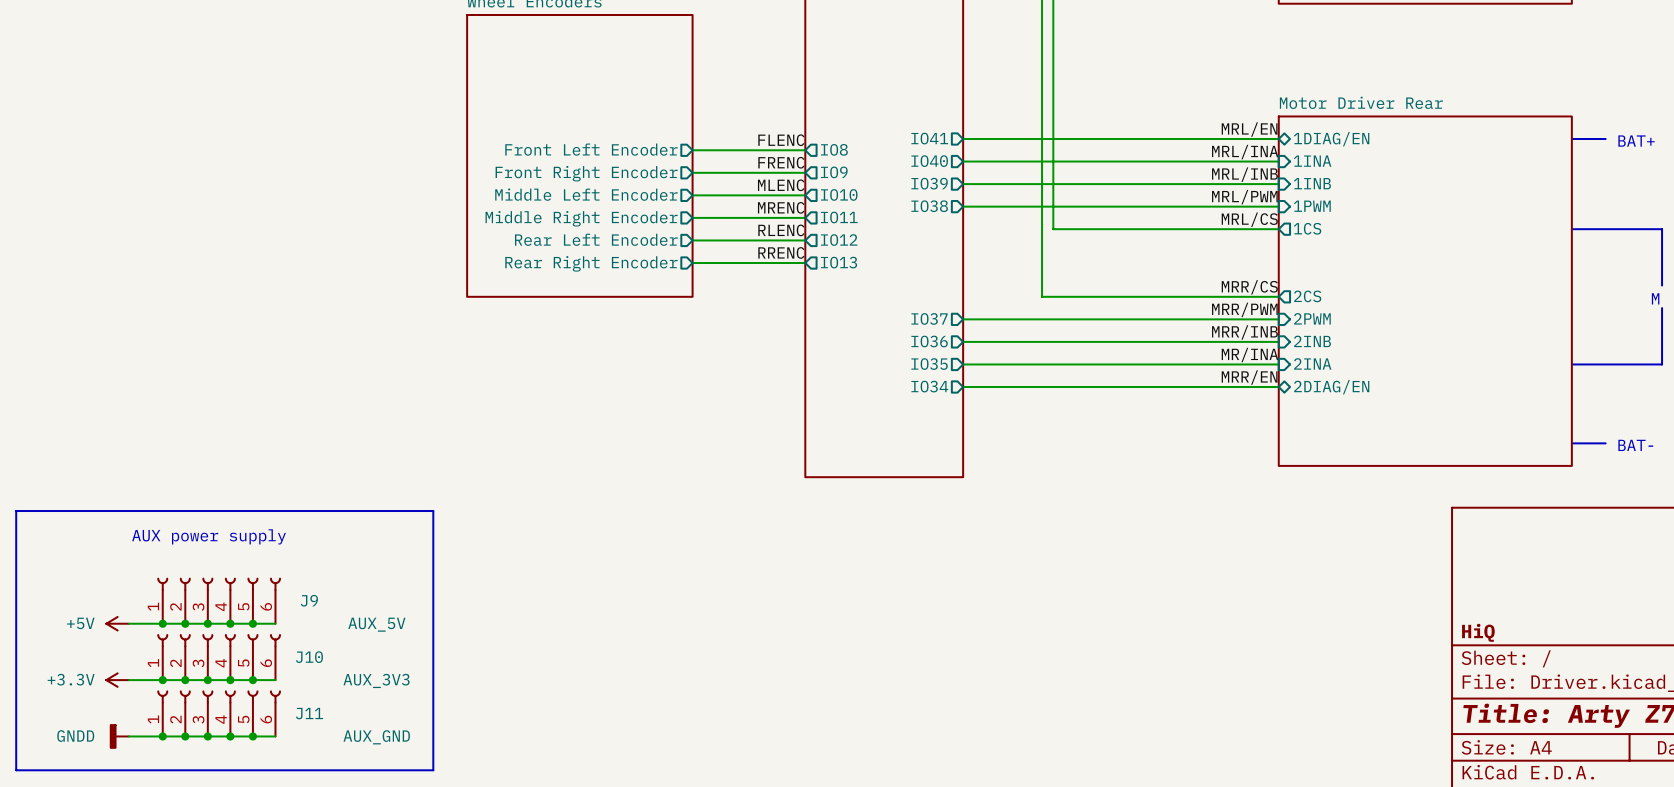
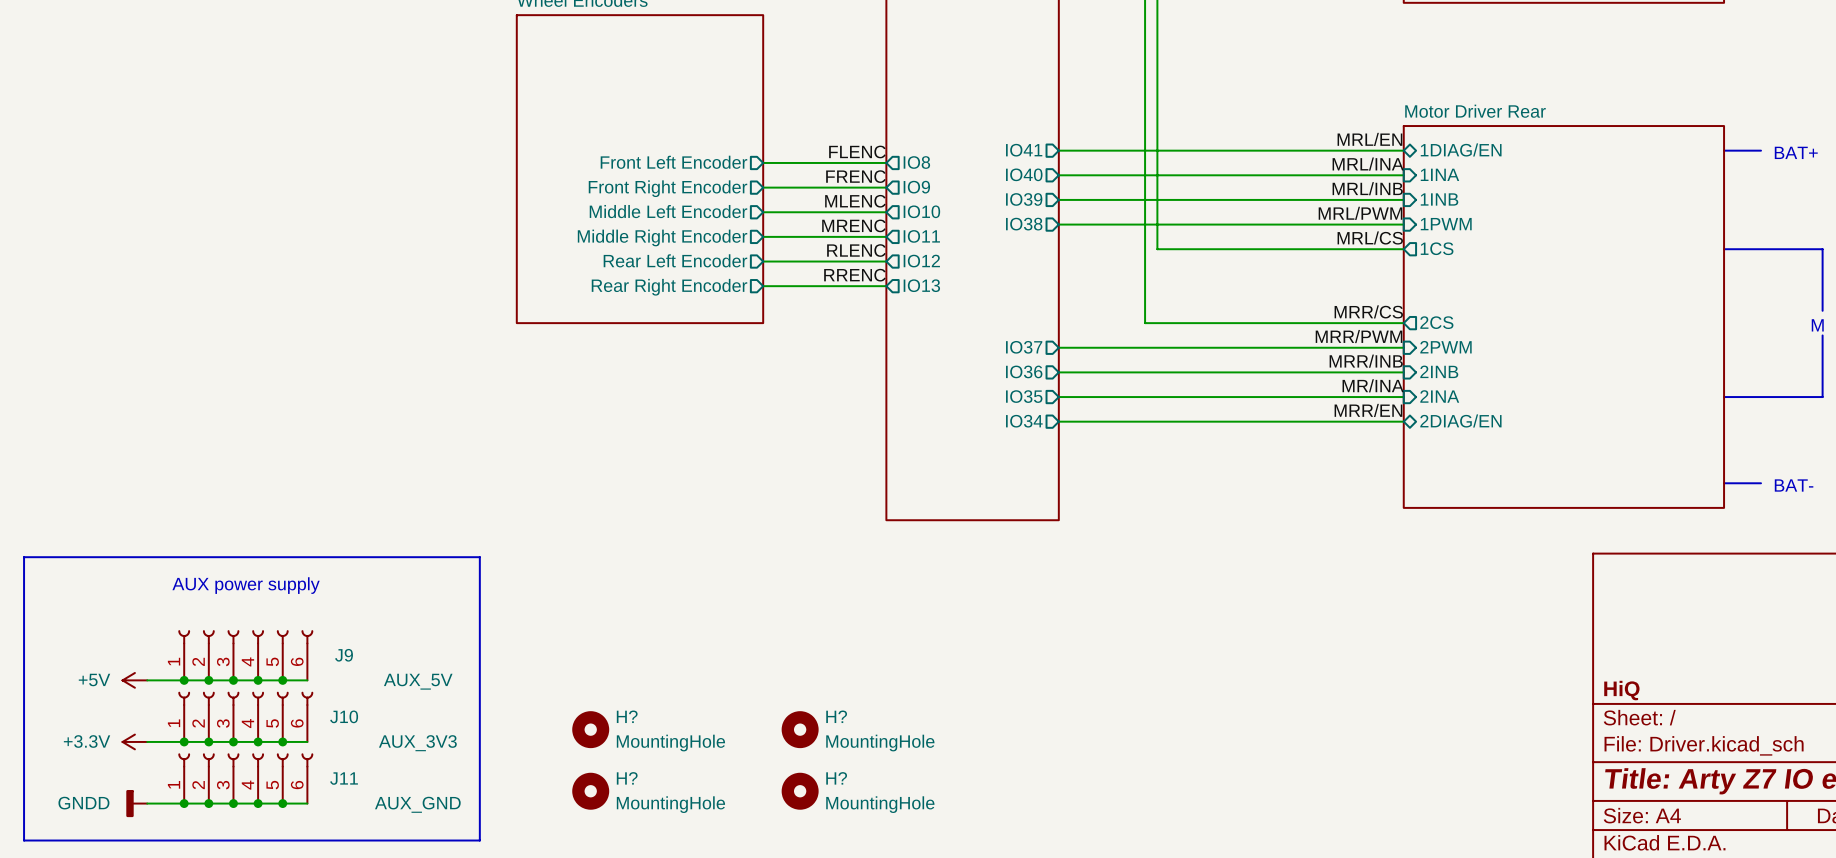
H?: none -> MountingHole (590, 729)
H?: none -> MountingHole (800, 729)
H?: none -> MountingHole (590, 791)
H?: none -> MountingHole (800, 791)

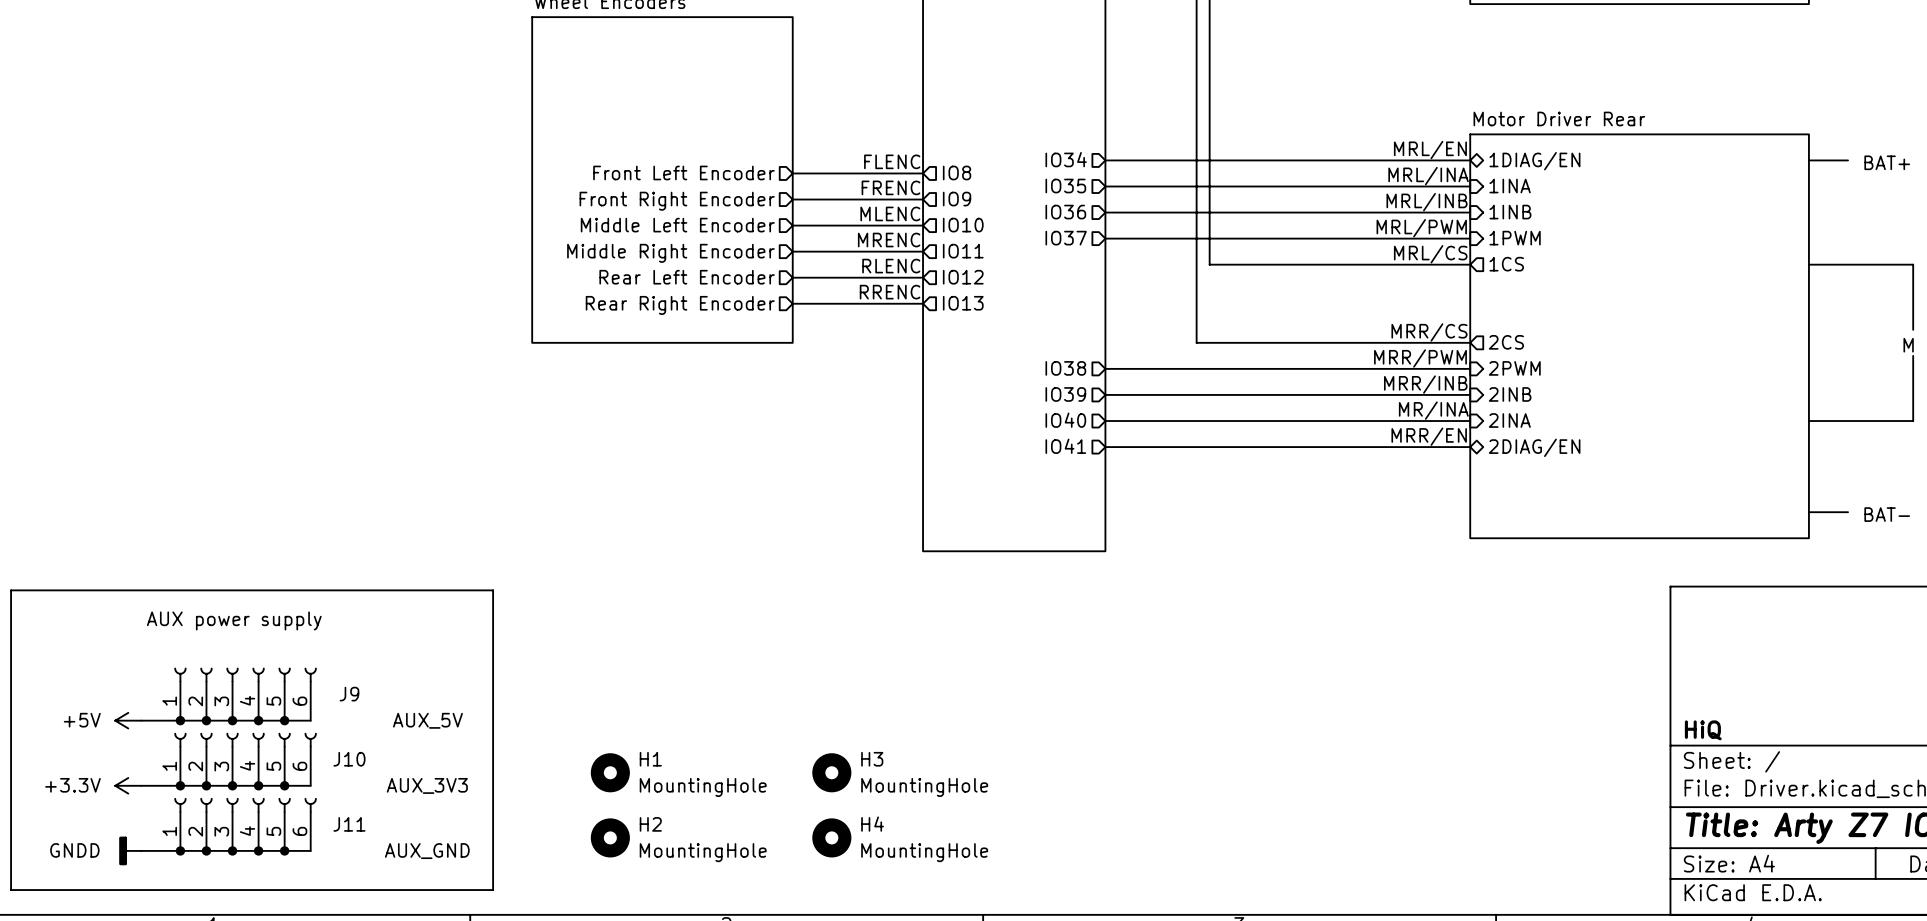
sheet pin: IO41 (1024, 150) -> IO34 (1066, 159)
sheet pin: IO40 (1024, 174) -> IO35 (1065, 186)
sheet pin: IO39 (1024, 199) -> IO36 (1065, 212)
sheet pin: IO38 (1024, 224) -> IO37 (1066, 238)
sheet pin: IO37 (1024, 347) -> IO38 (1065, 368)
sheet pin: IO36 (1024, 371) -> IO39 (1065, 394)
sheet pin: IO35 (1024, 396) -> IO40 (1065, 420)
sheet pin: IO34 (1024, 421) -> IO41 (1065, 446)
H? name: H? (627, 716) -> H1 (650, 759)
H? name: H? (836, 716) -> H3 (872, 759)
H? name: H? (627, 778) -> H2 (650, 824)
H? name: H? (836, 778) -> H4 (872, 824)

